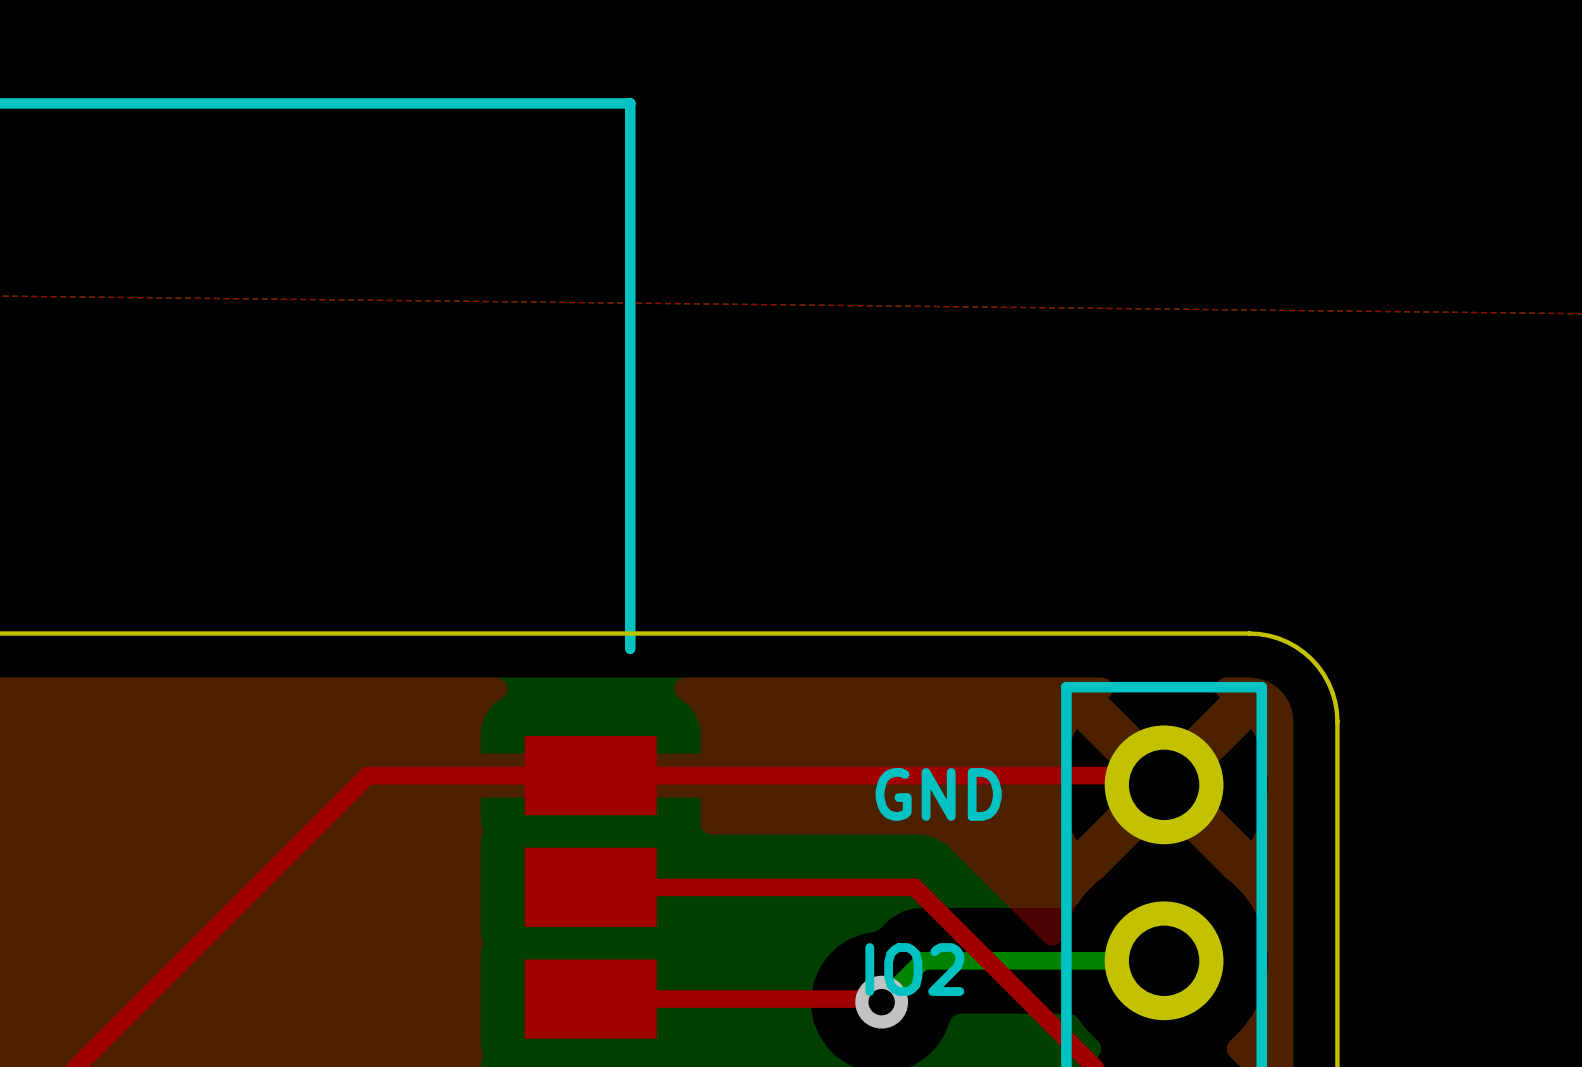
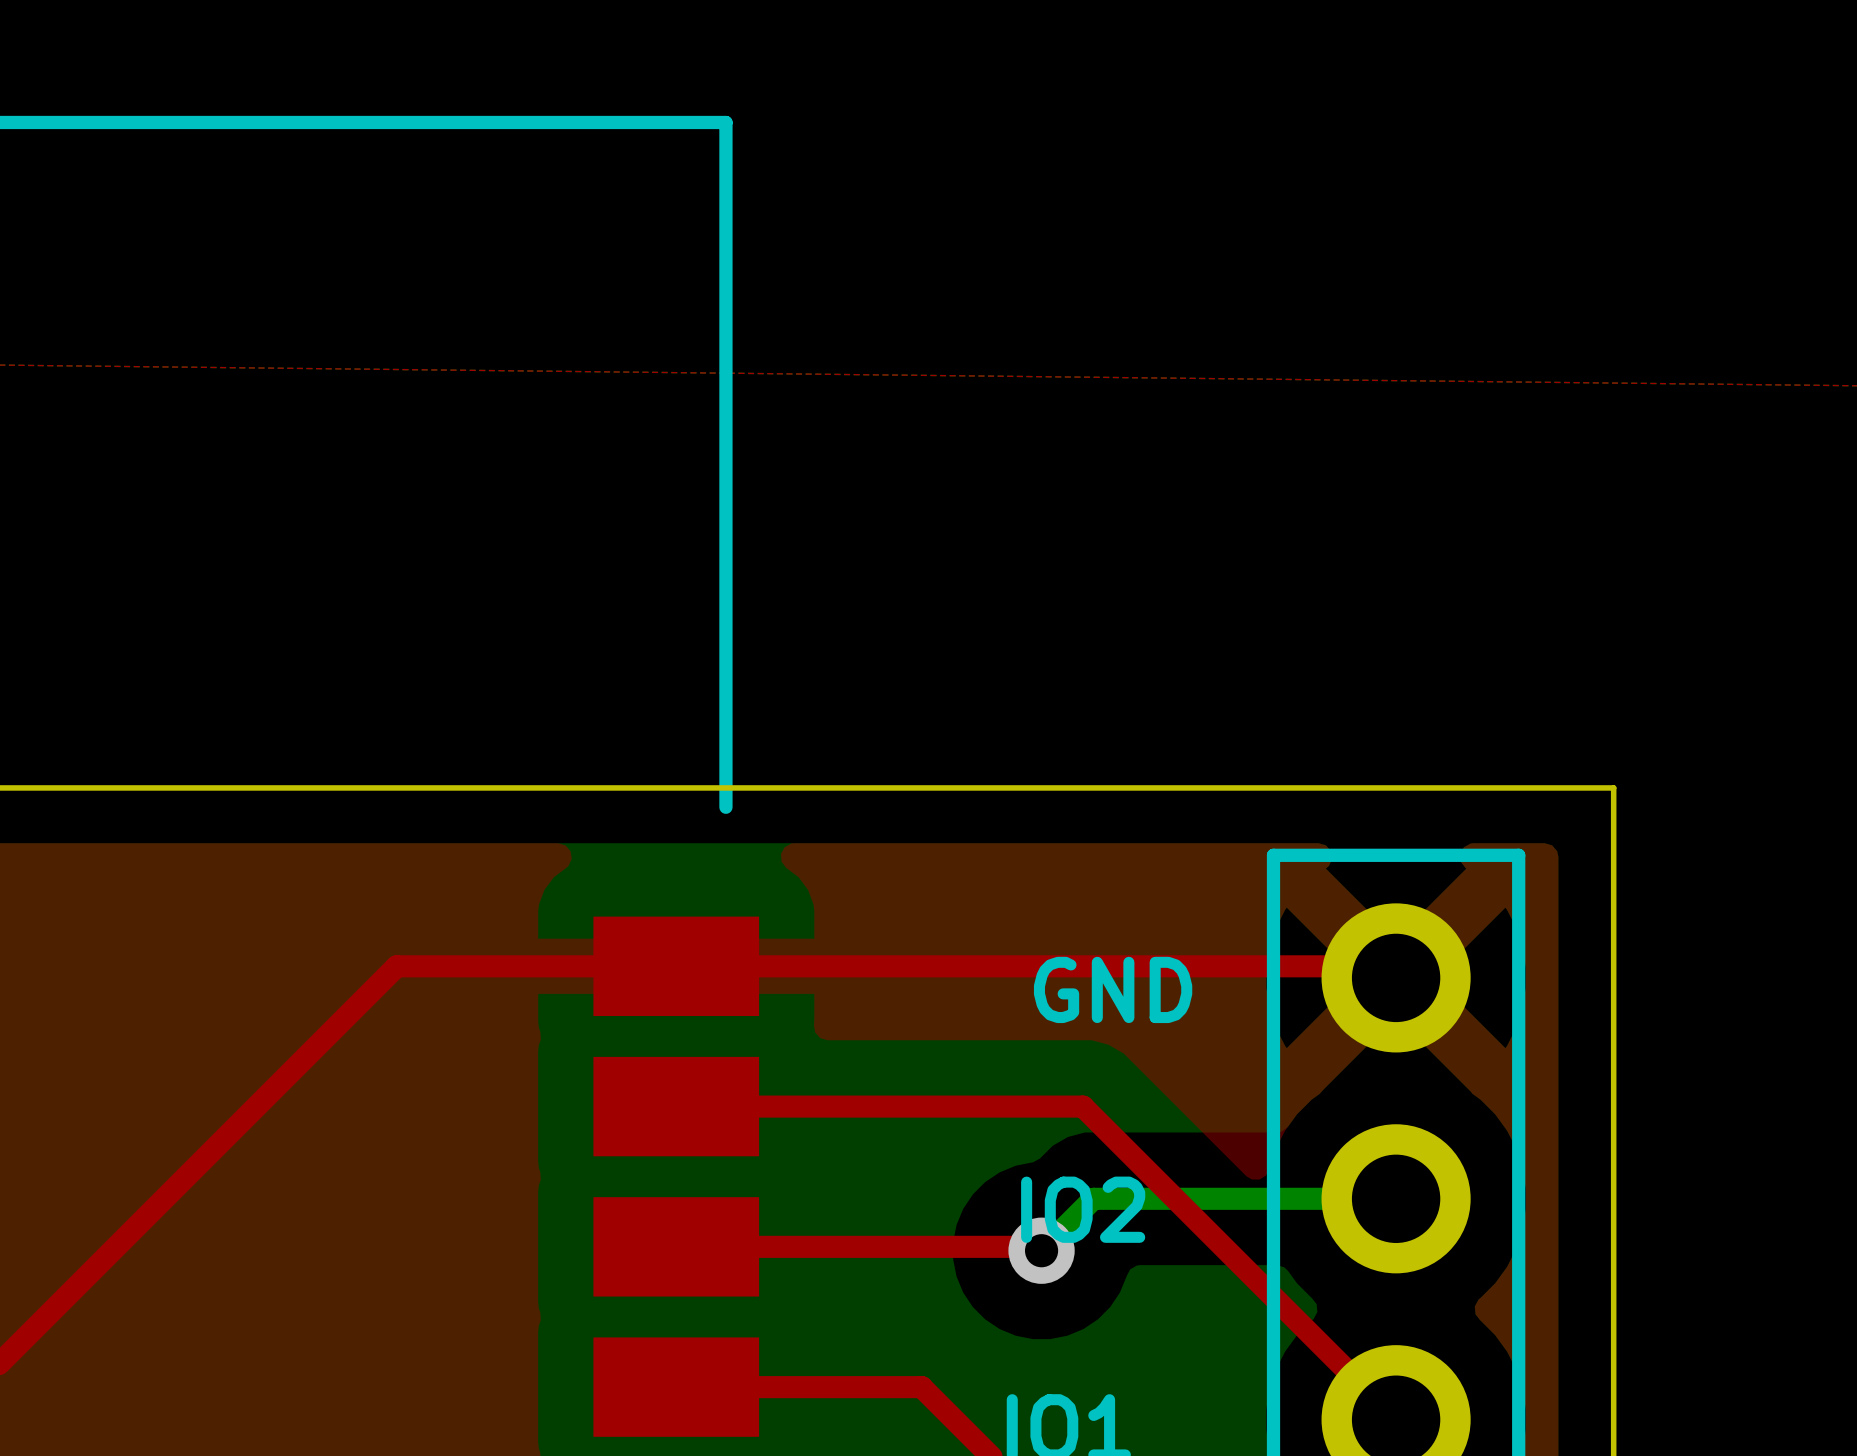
board edge: (1249, 633) (1278, 638) (1296, 647) (1311, 659) (1323, 674) (1332, 692) (1337, 721) -> (1503, 787) (1613, 787) (1613, 898)

